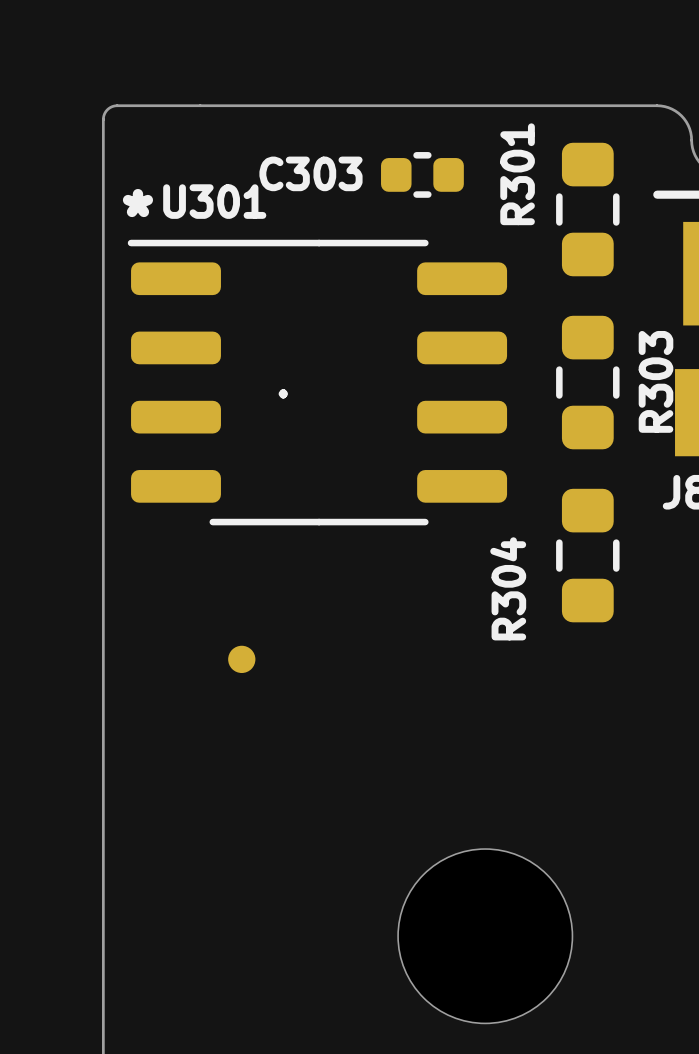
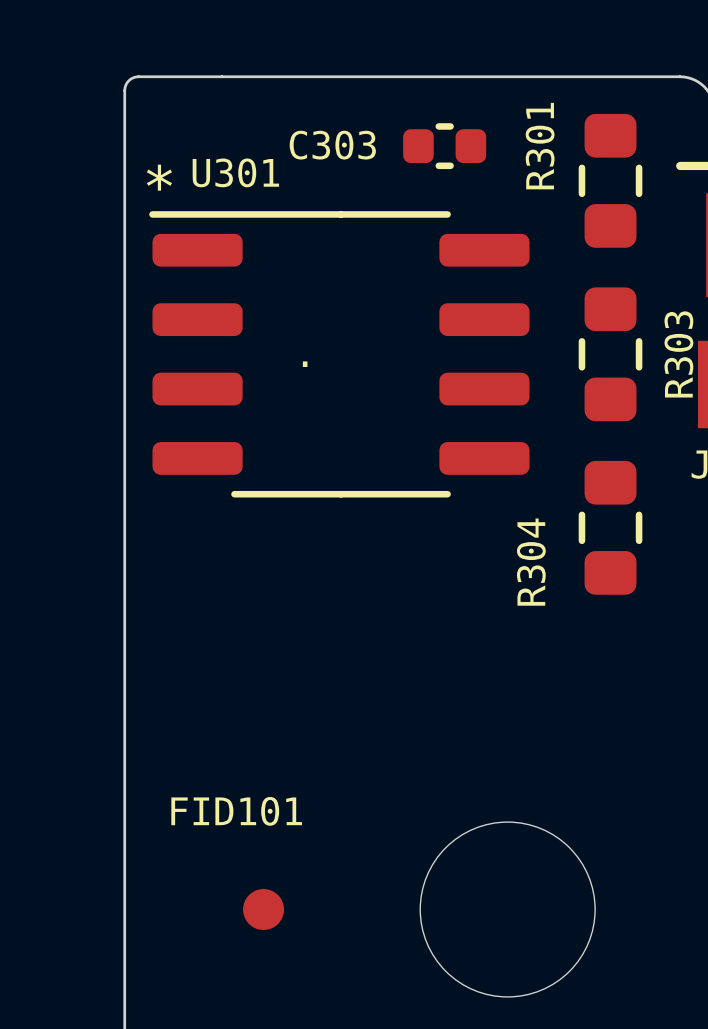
part: (241, 659) -> none
FID101: none -> (263, 909)

